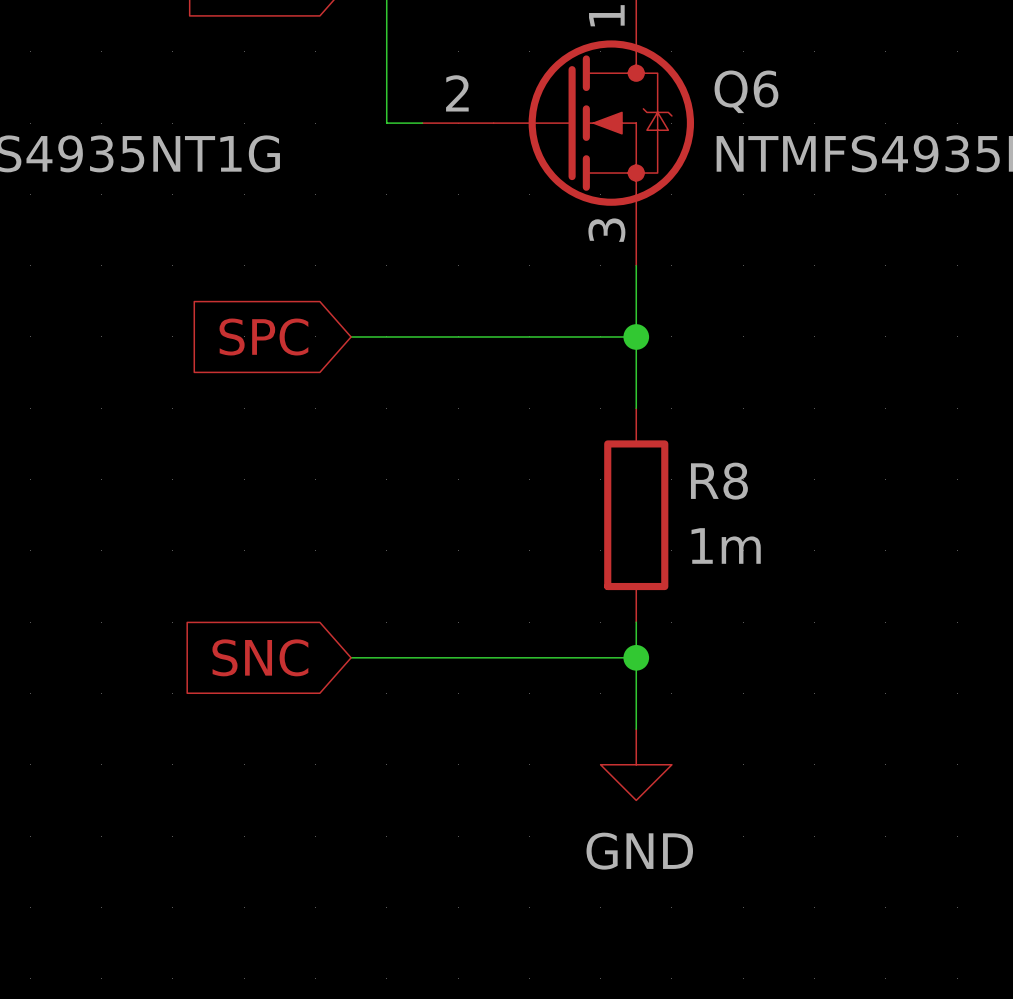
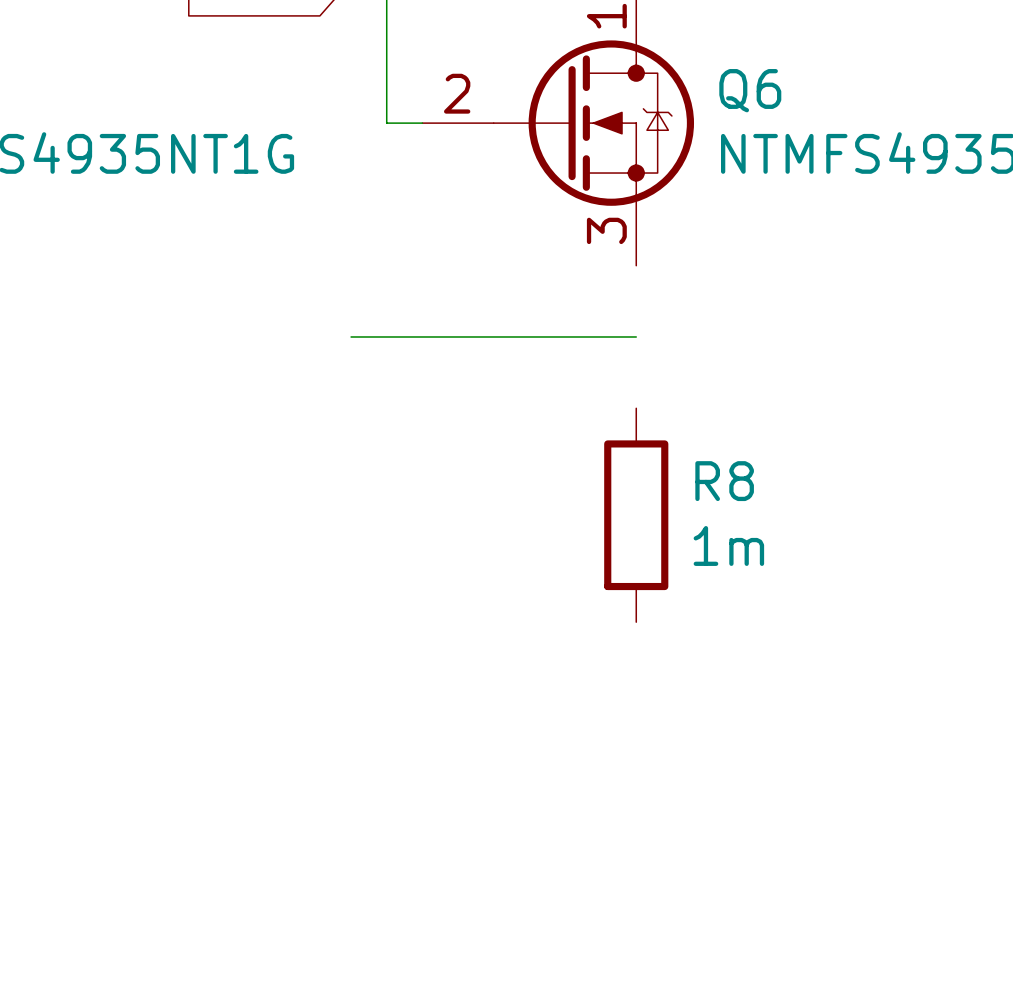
wire: (636, 265) (636, 408) -> none
junction: (636, 336) -> none
global label: SPC (263, 337) -> none
wire: (636, 622) (636, 729) -> none
global label: SNC (260, 657) -> none
wire: (351, 657) (636, 657) -> none
junction: (636, 657) -> none
power symbol: GND (636, 764) -> none

